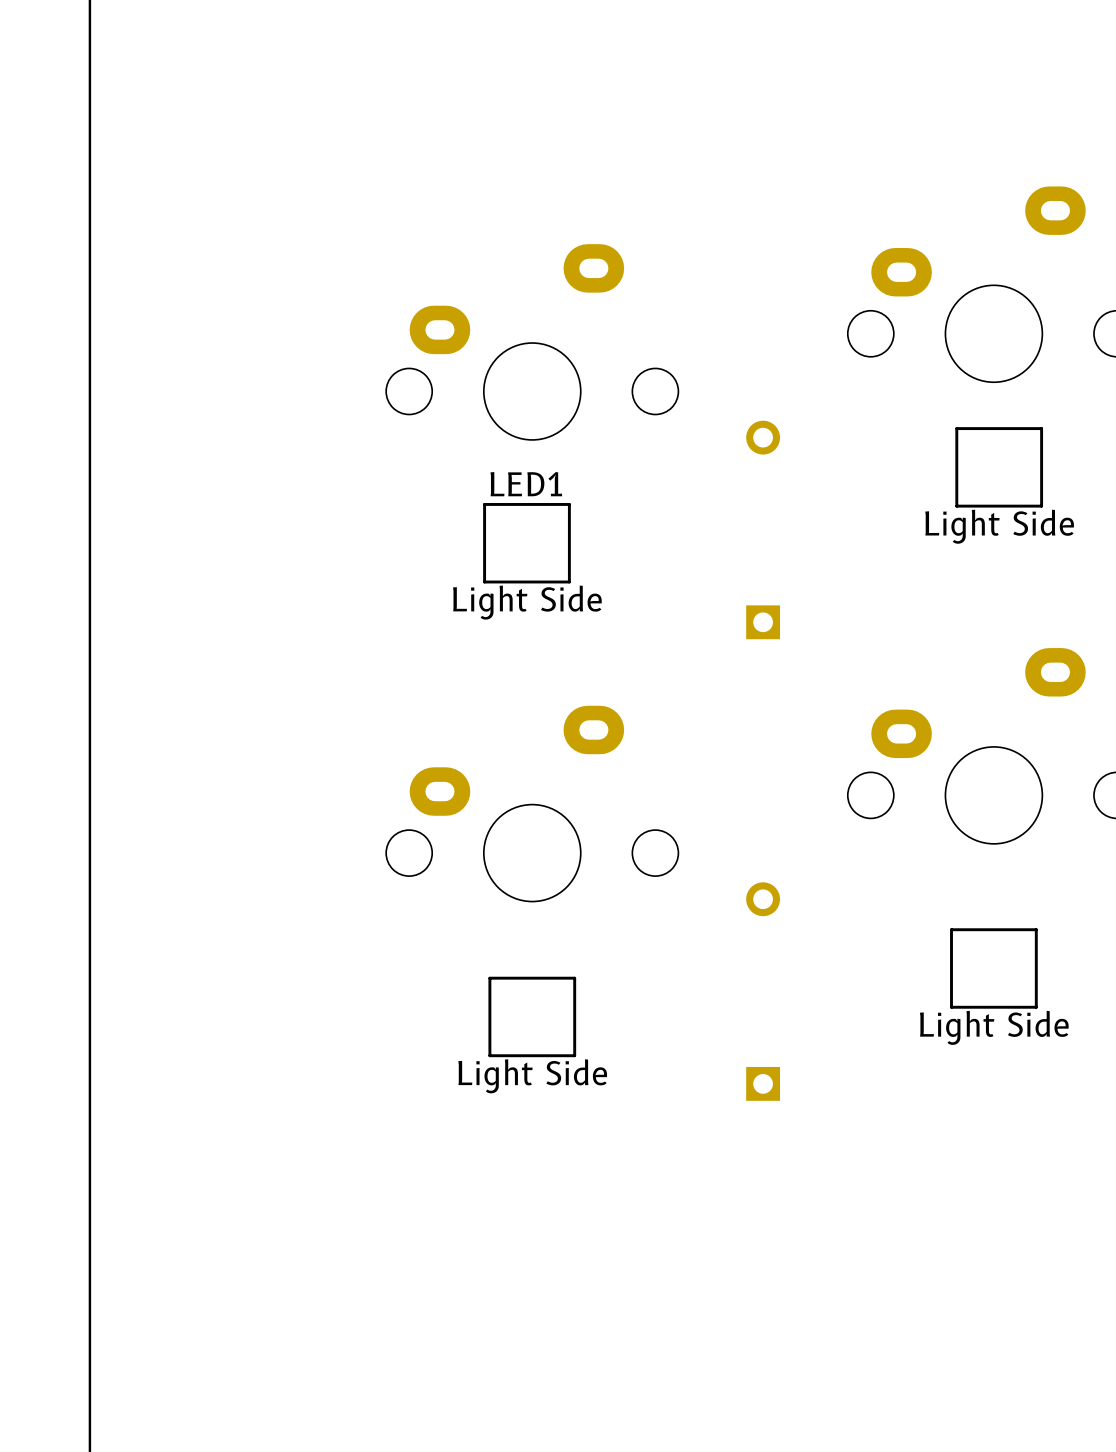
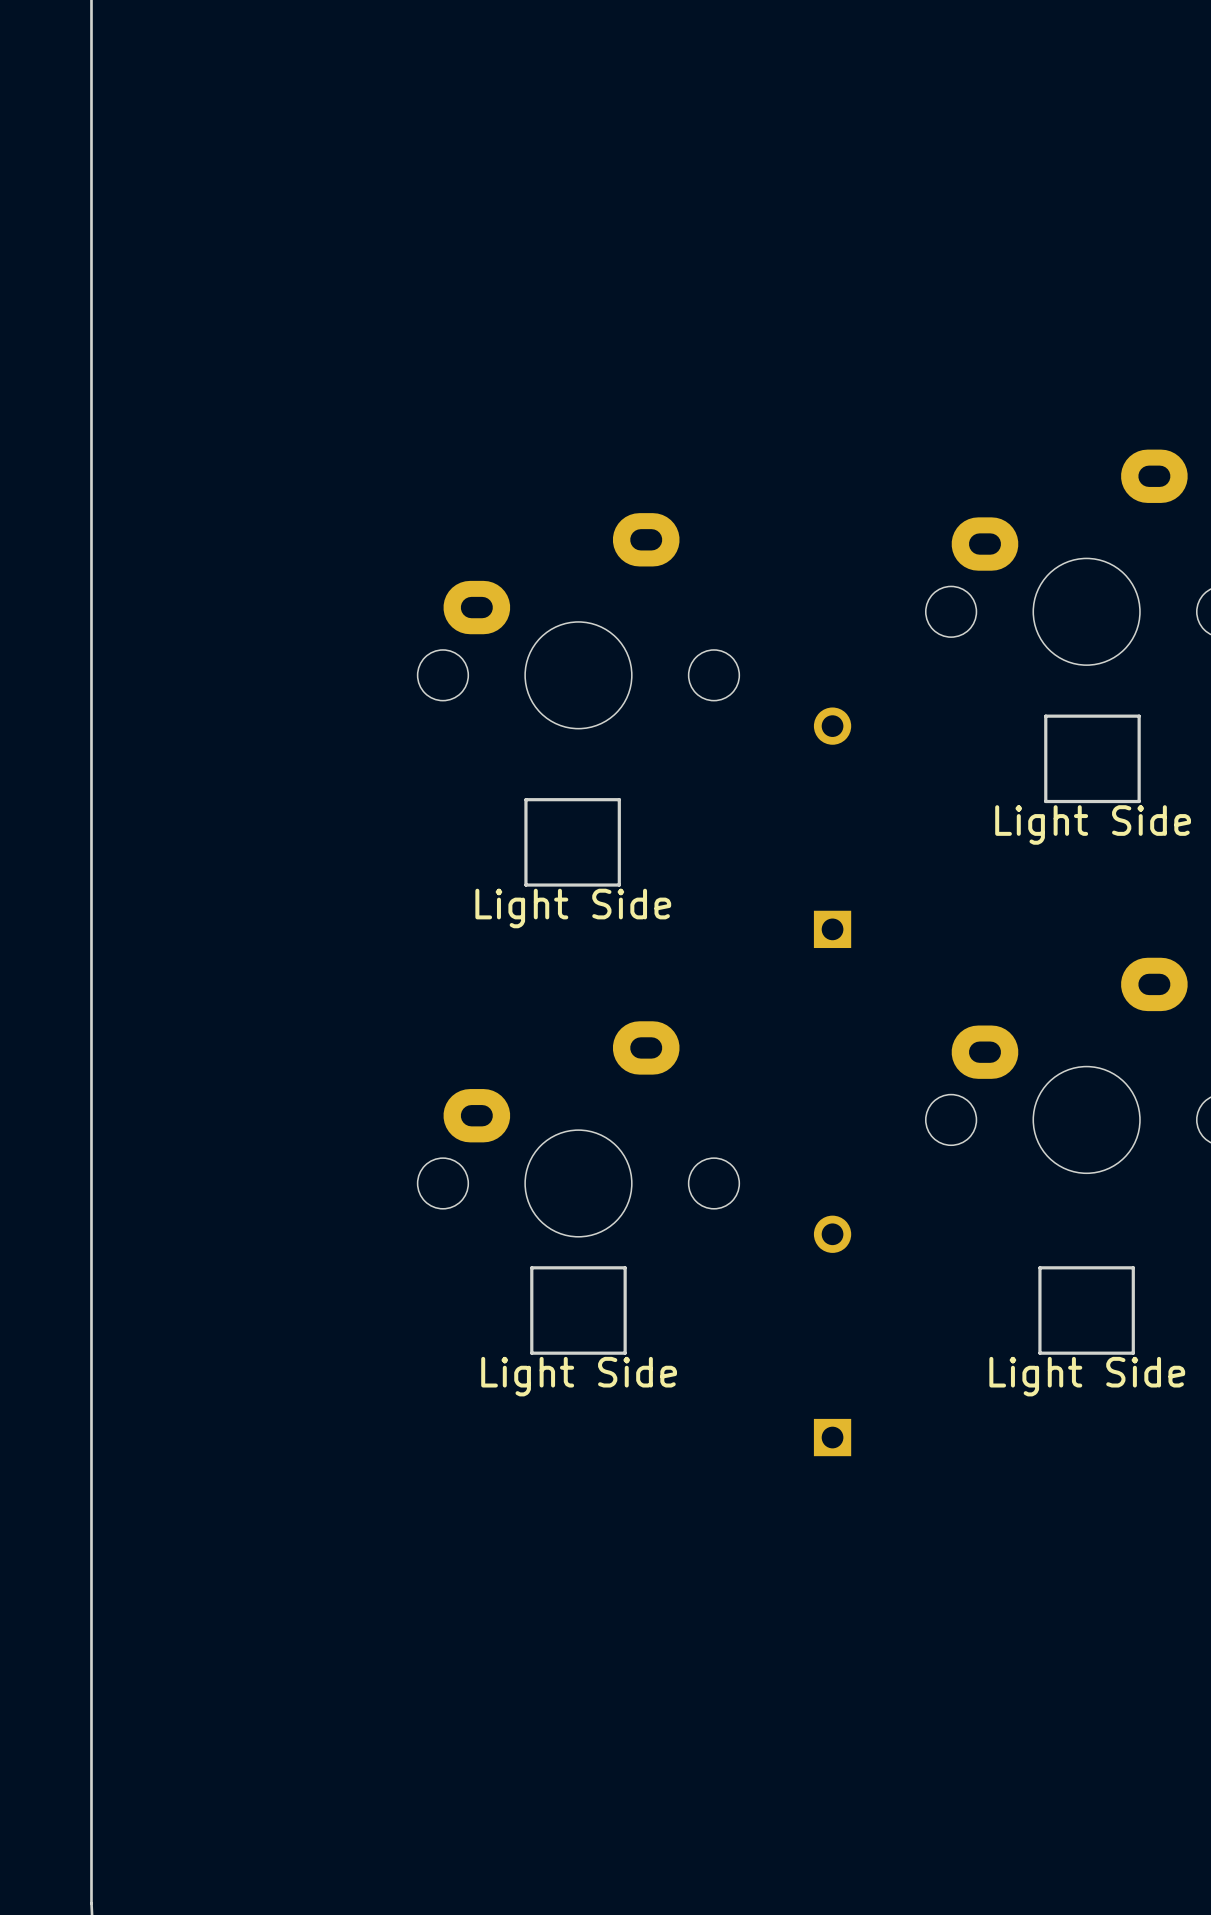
LED1 name: LED1 (526, 484) -> none
part position: (532, 1016) -> (578, 1310)

